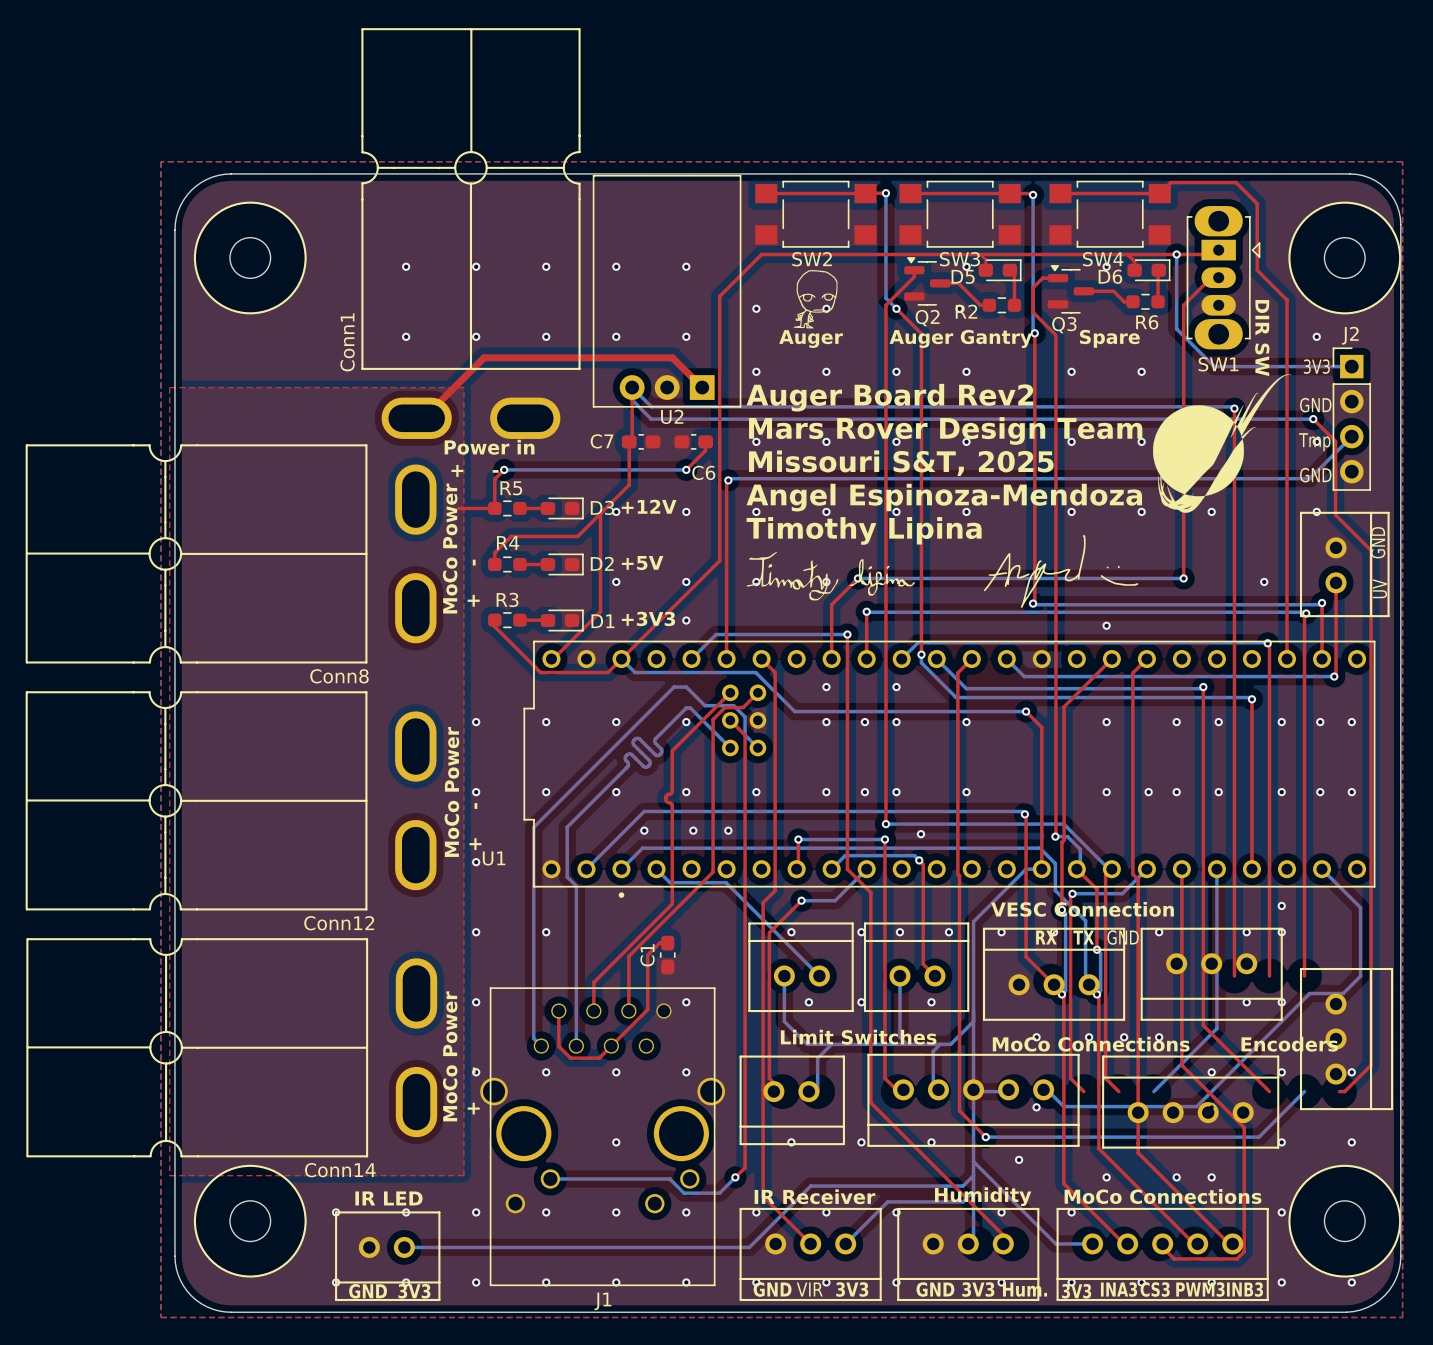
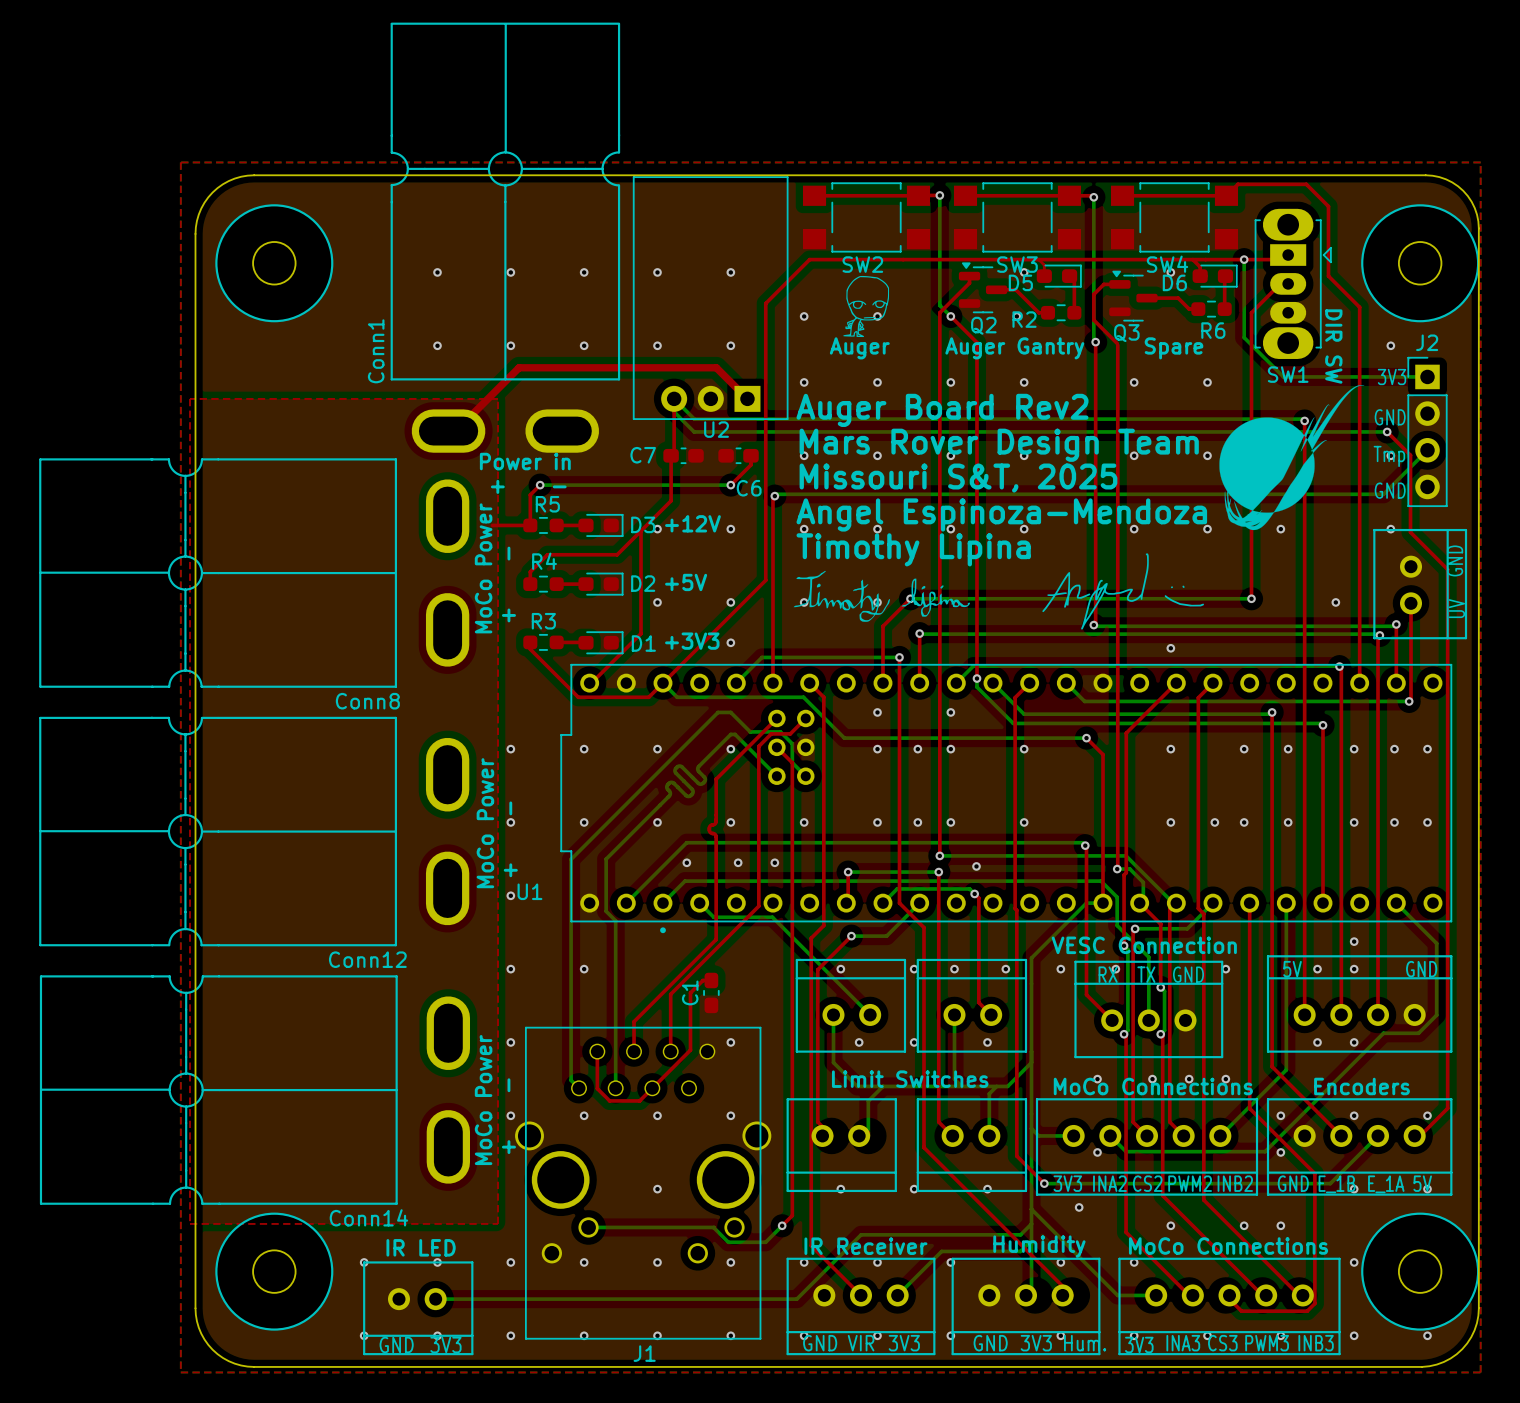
text: none -> 5V (1292, 969)
text: none -> GND (1421, 969)
part: none -> (1359, 1003)
part position: (1054, 974) -> (1148, 1009)
part: (1211, 974) -> none
part: (1346, 1039) -> none
part: none -> (971, 1145)
part position: (973, 1100) -> (1147, 1146)
part: (1190, 1102) -> none
part: none -> (1359, 1146)
text: none -> 3V3 (1067, 1183)
text: none -> INA2 (1109, 1183)
text: none -> CS2 (1147, 1183)
text: none -> PWM2 (1190, 1183)
text: none -> INB2 (1235, 1183)
text: none -> GND (1293, 1183)
text: none -> 5V (1422, 1183)
text: none -> E_1B (1337, 1184)
text: none -> E_1A (1386, 1184)

